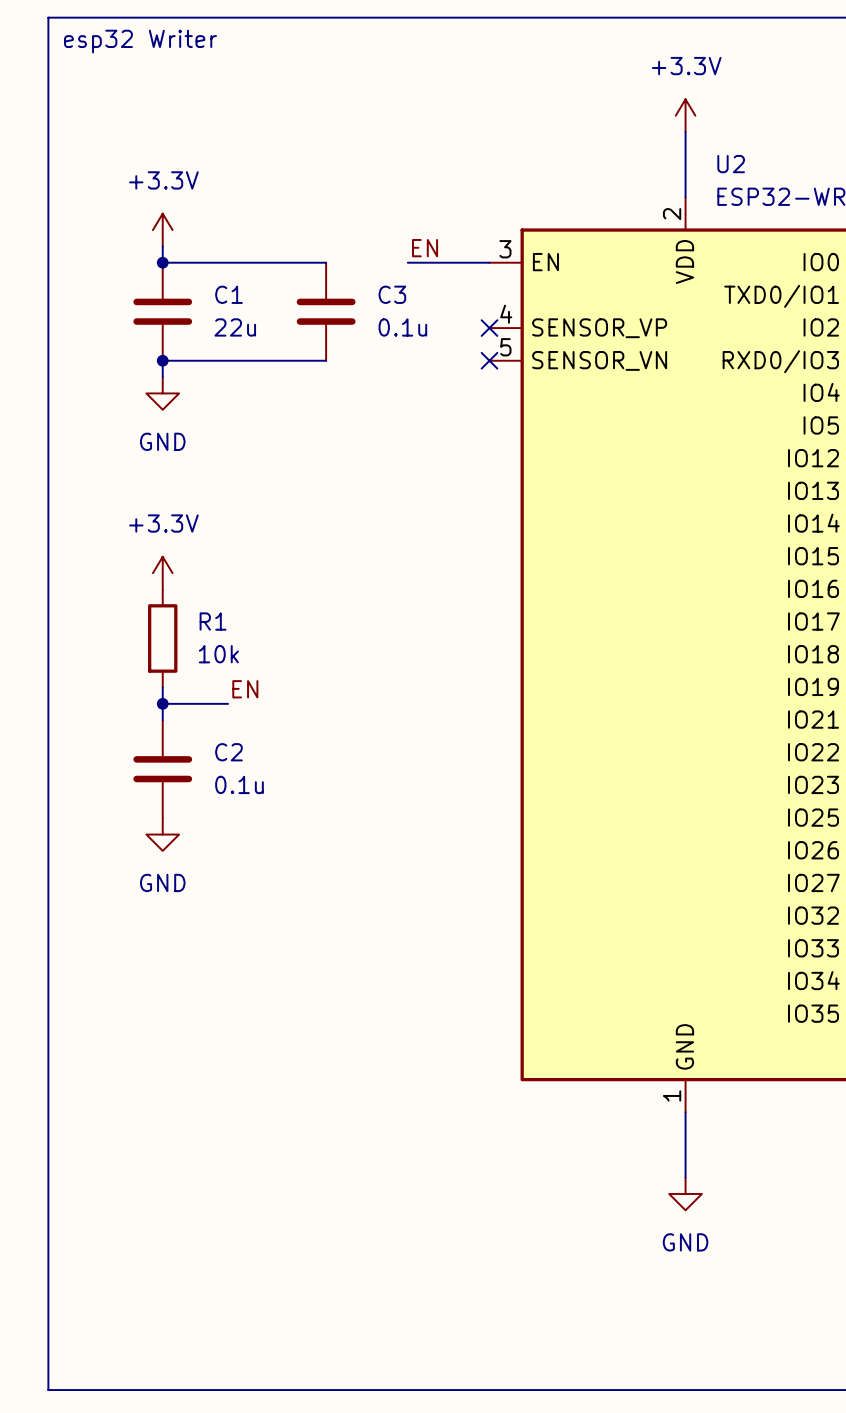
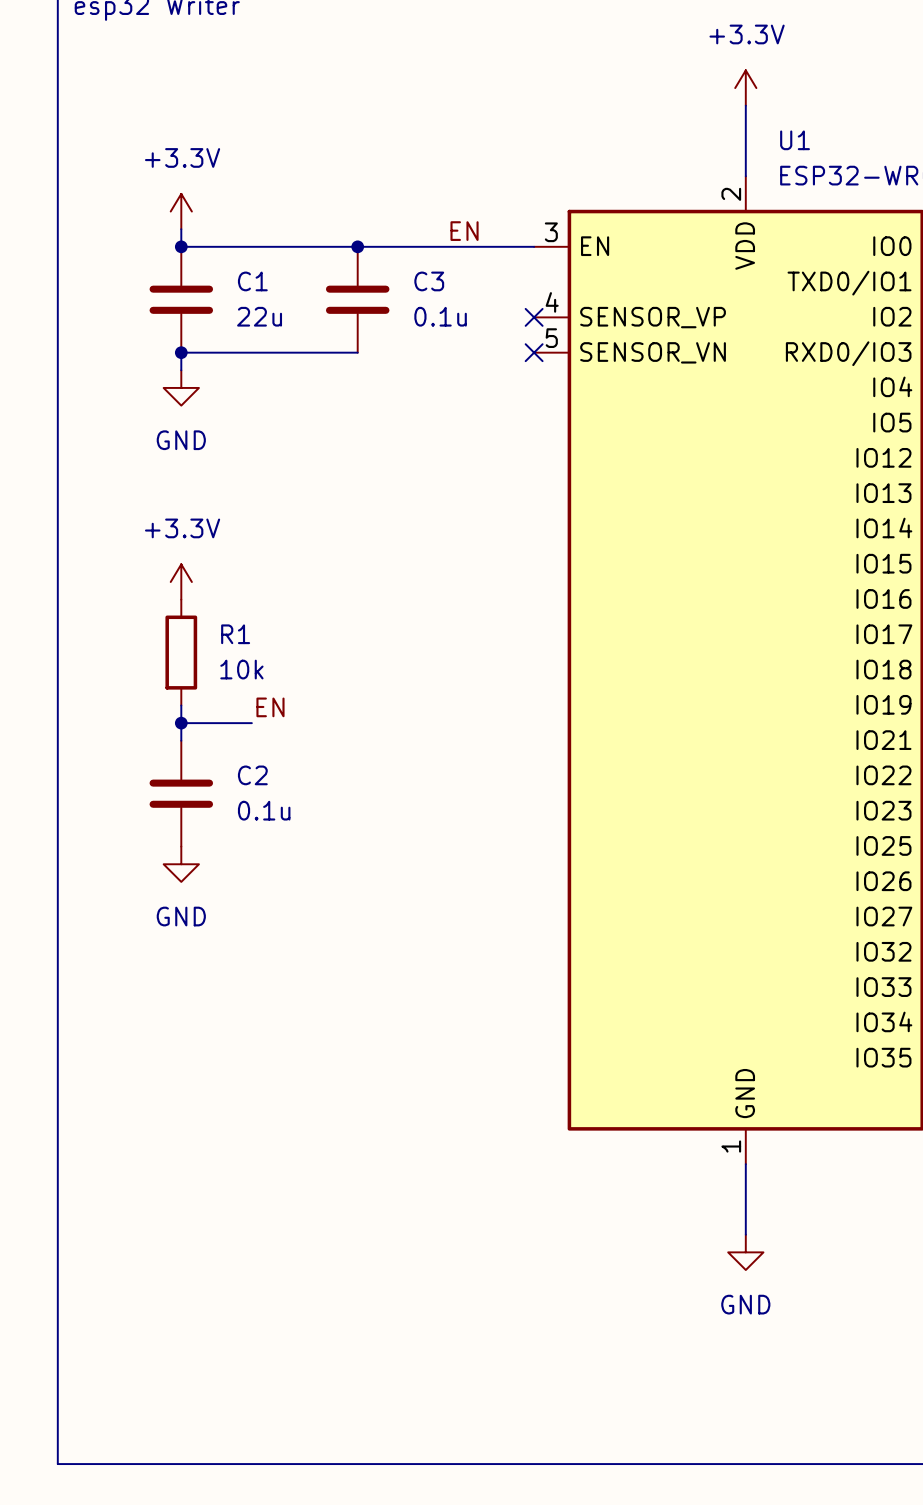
U2 name: U2 (731, 164) -> U1 (795, 140)
wire: none -> (357, 246) (445, 246)
junction: none -> (357, 246)

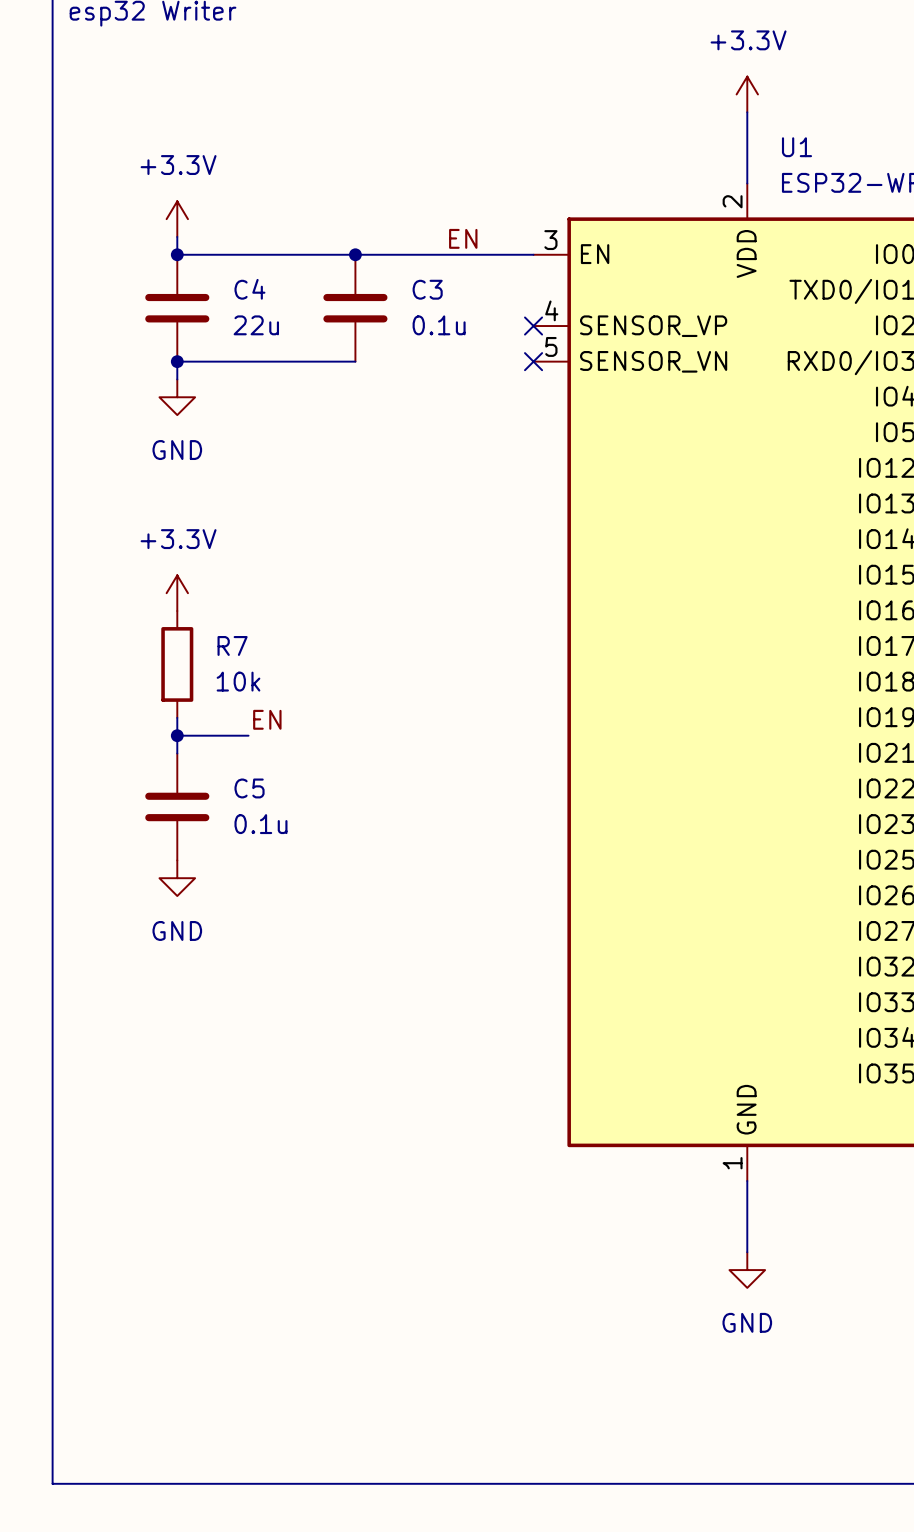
C1 name: C1 (252, 281) -> C4 (249, 289)
R1 name: R1 (235, 634) -> R7 (232, 645)
C2 name: C2 (252, 775) -> C5 (249, 788)

